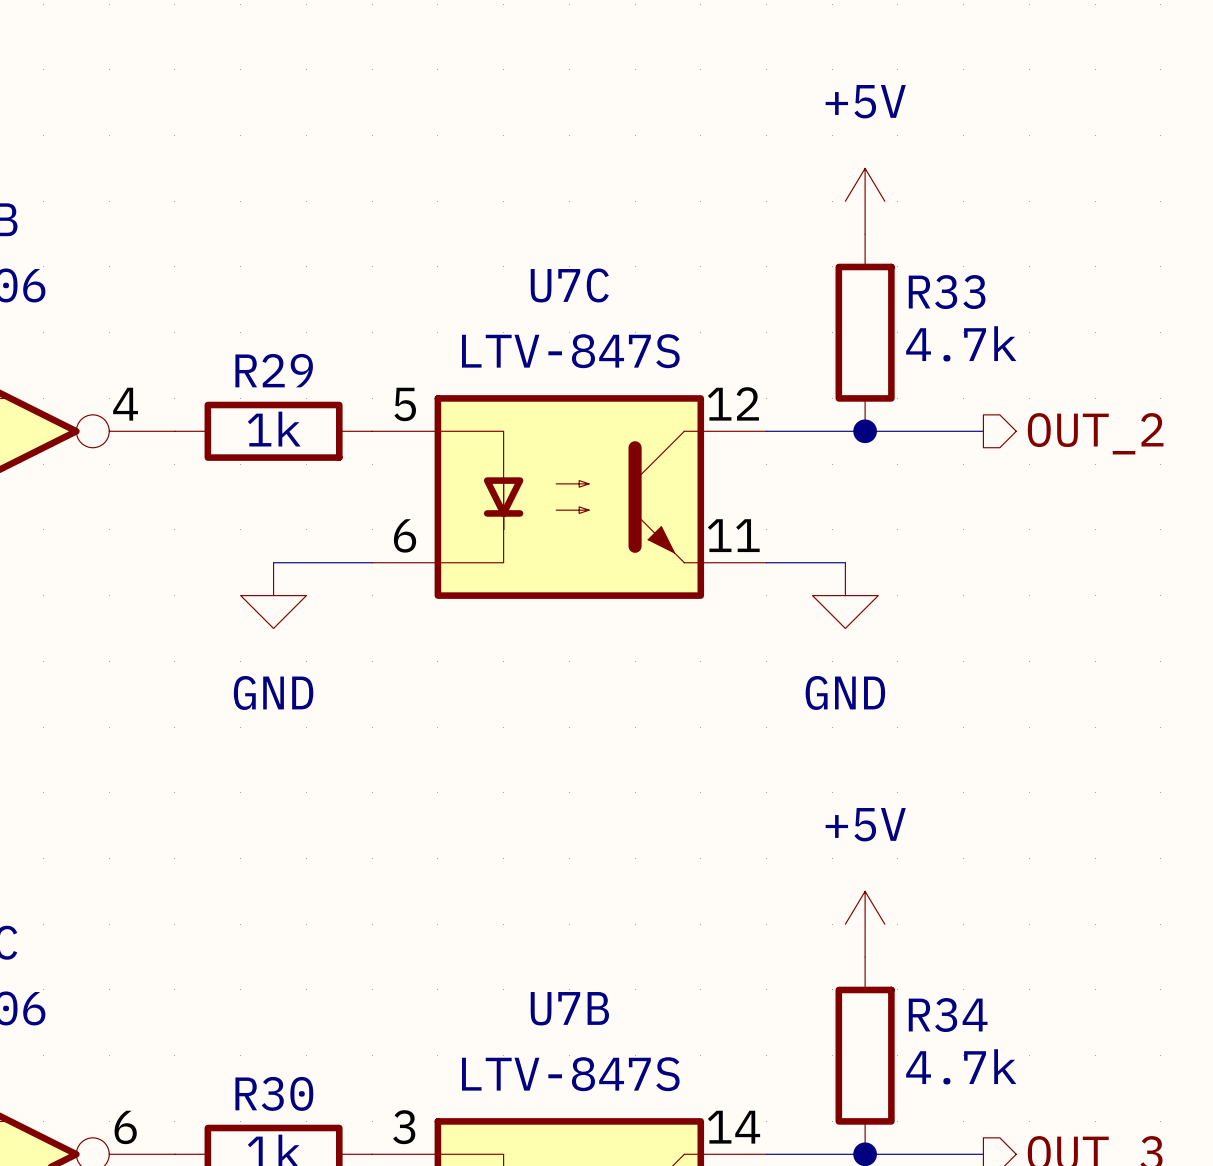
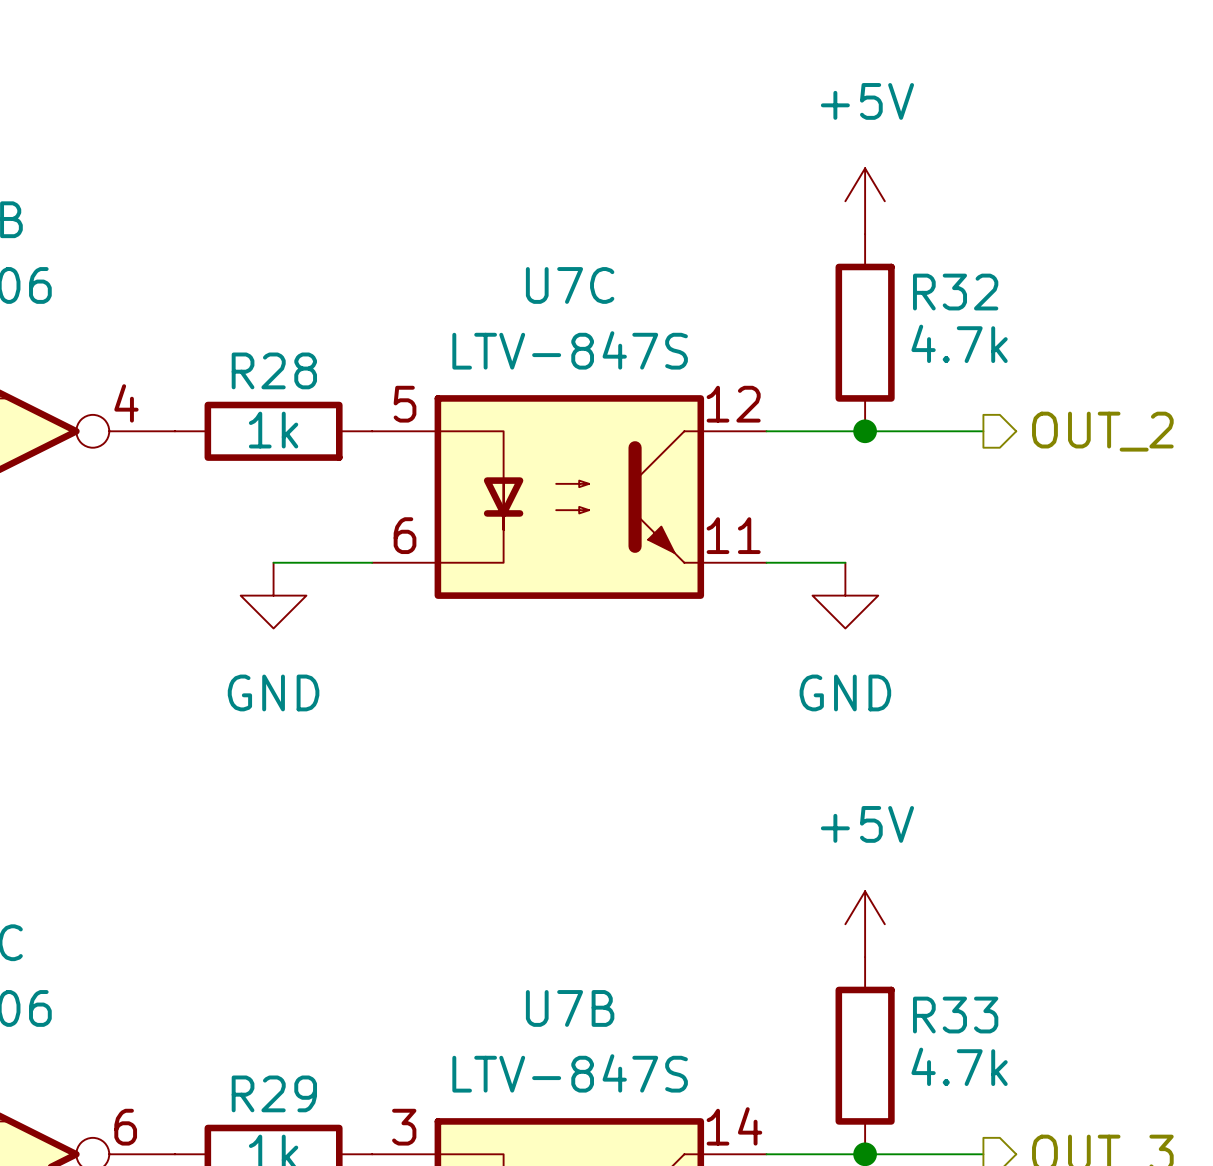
R33 name: R33 (947, 292) -> R32 (955, 292)
R29 name: R29 (274, 370) -> R28 (274, 370)
R34 name: R34 (948, 1015) -> R33 (955, 1015)
R30 name: R30 (274, 1093) -> R29 (274, 1093)

